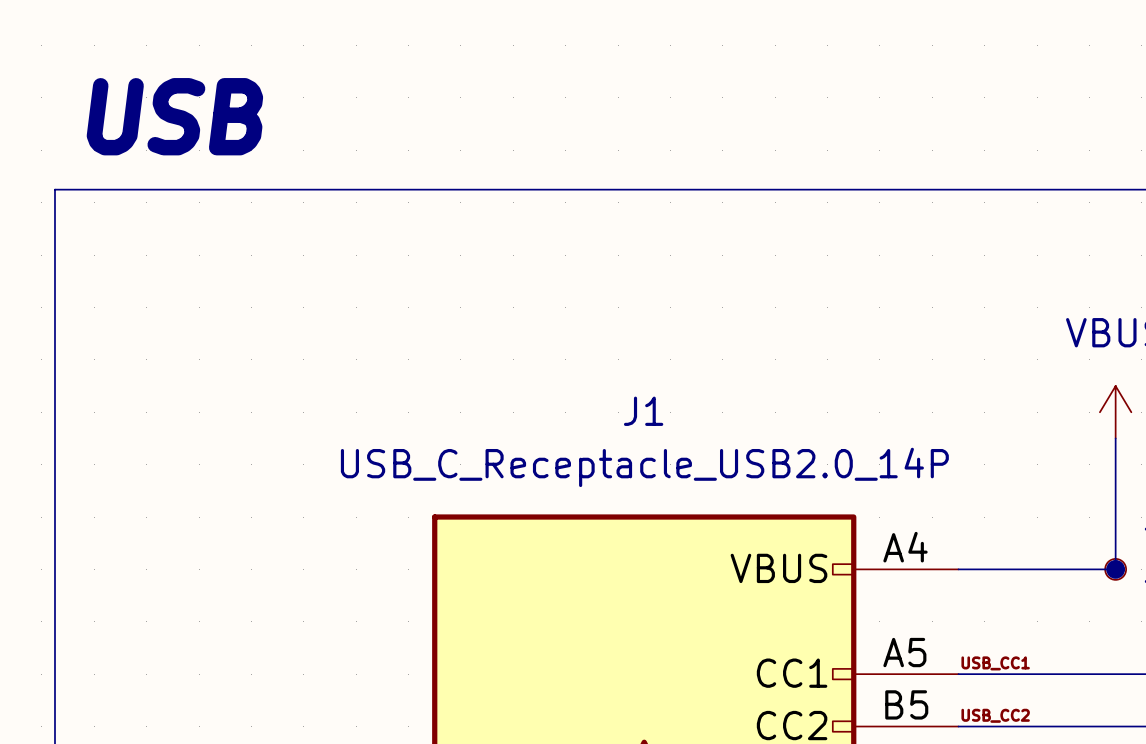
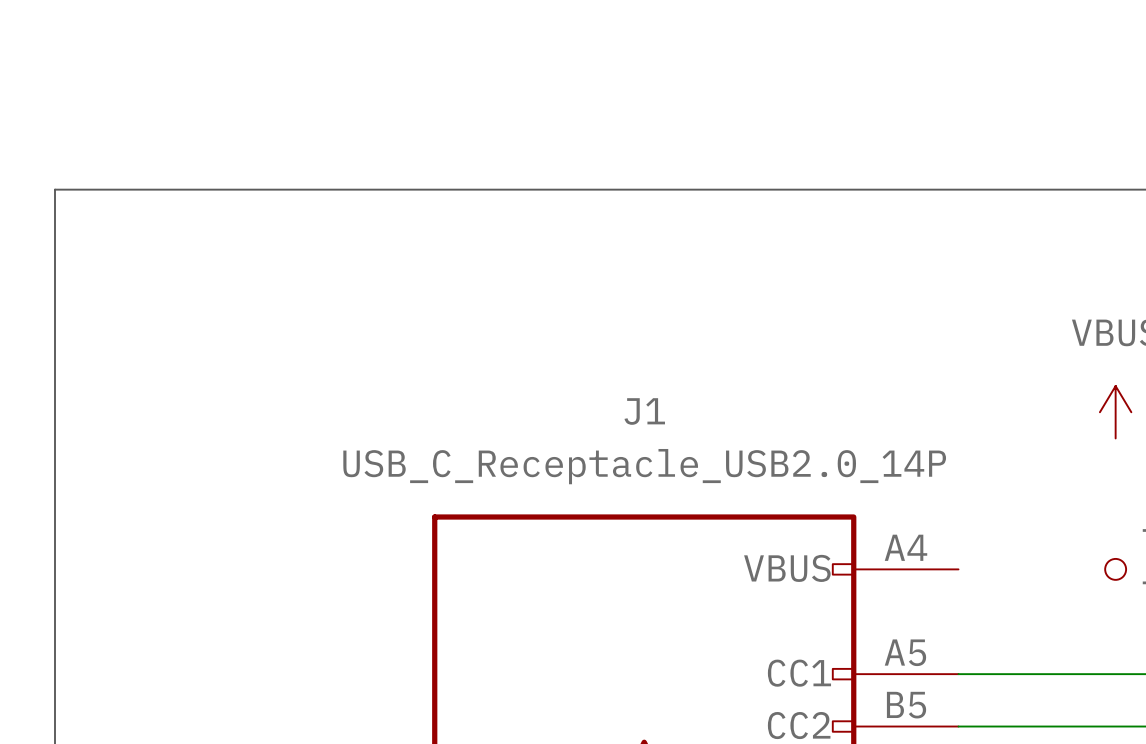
text: USB (174, 116) -> none
wire: (1115, 438) (1115, 569) (958, 569) -> none
junction: (1115, 569) -> none
label: USB_CC1 (995, 663) -> none
label: USB_CC2 (995, 715) -> none

